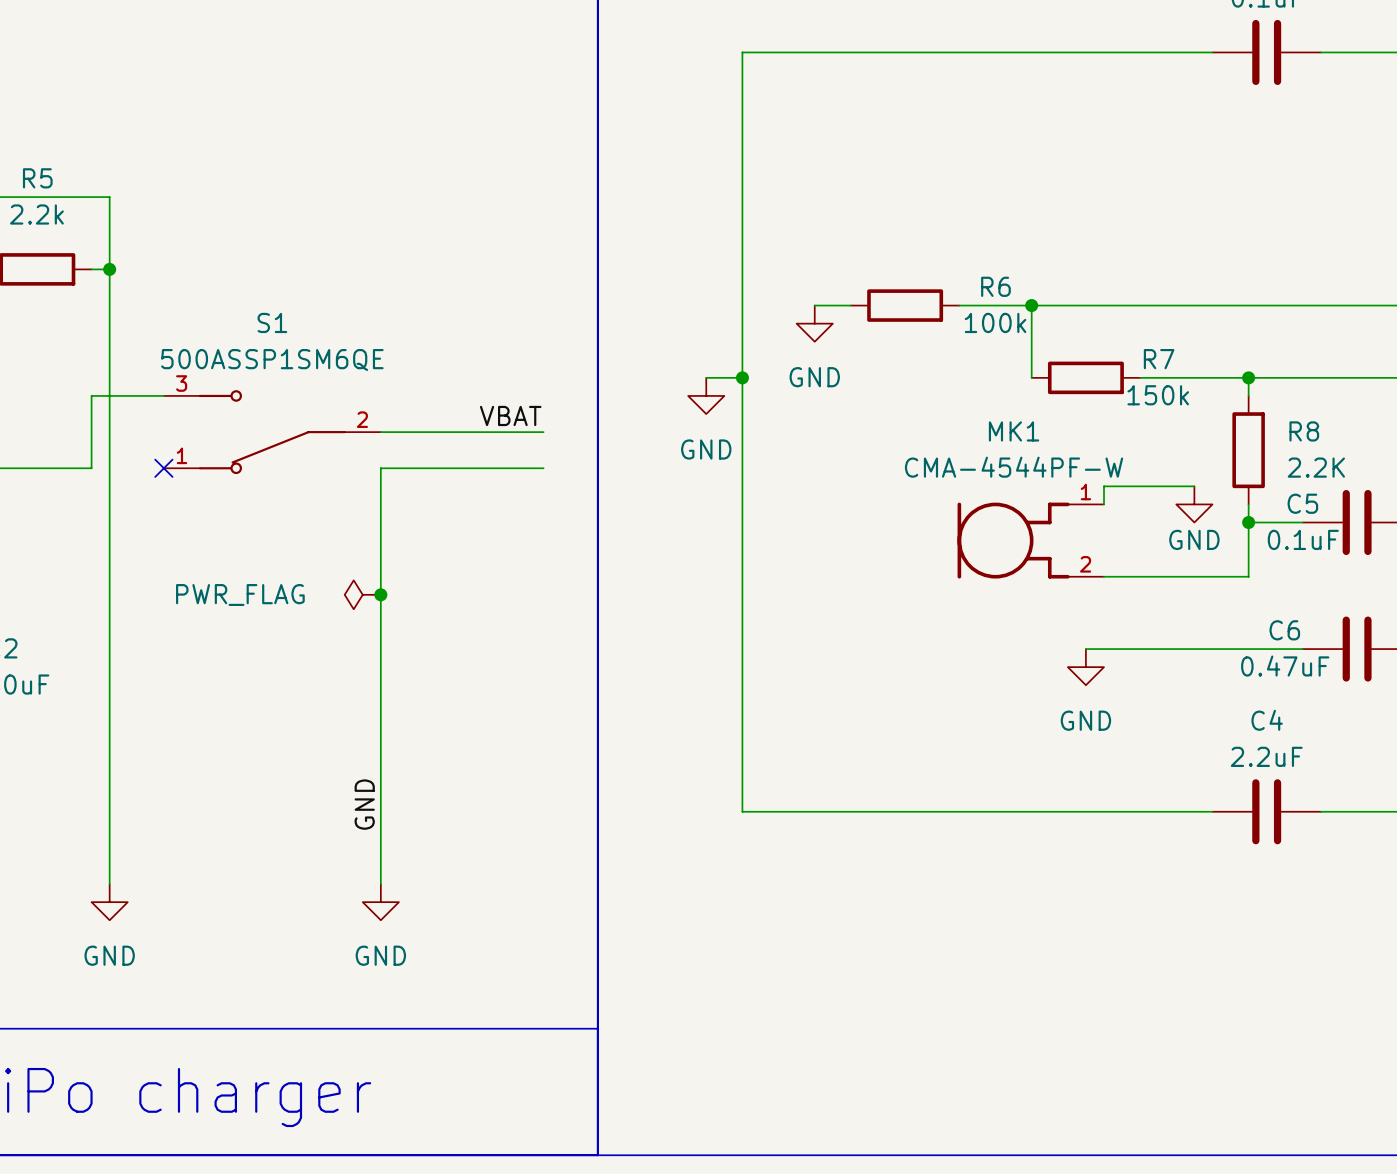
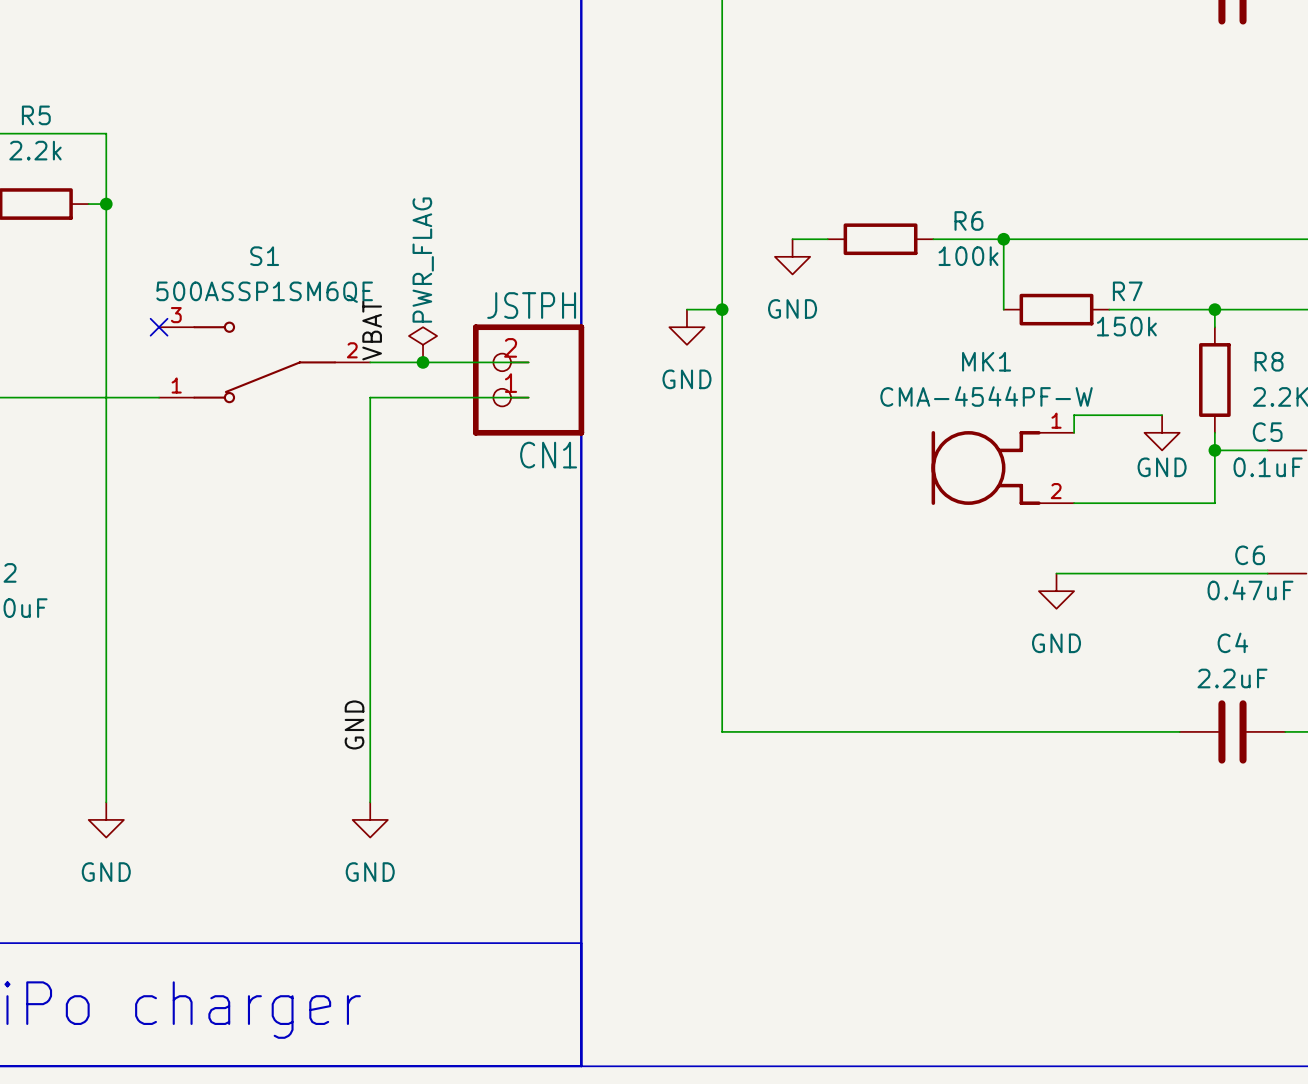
wire: (163, 395) (91, 395) (91, 468) -> (159, 397) (88, 397)
label rotation: 0° (510, 415) -> 90° counterclockwise (372, 330)
label position: VBAT (510, 415) -> VBAT (372, 330)
junction: none -> (423, 362)
CN1: none -> JSTPH (528, 380)
no-connect mark position: (163, 468) -> (159, 327)
power symbol rotation: 0° (362, 594) -> 90° clockwise (423, 344)
power symbol position: PWR_FLAG (362, 594) -> PWR_FLAG (423, 344)
junction: (380, 594) -> none
power symbol text position: PWR_FLAG (240, 595) -> PWR_FLAG (423, 260)

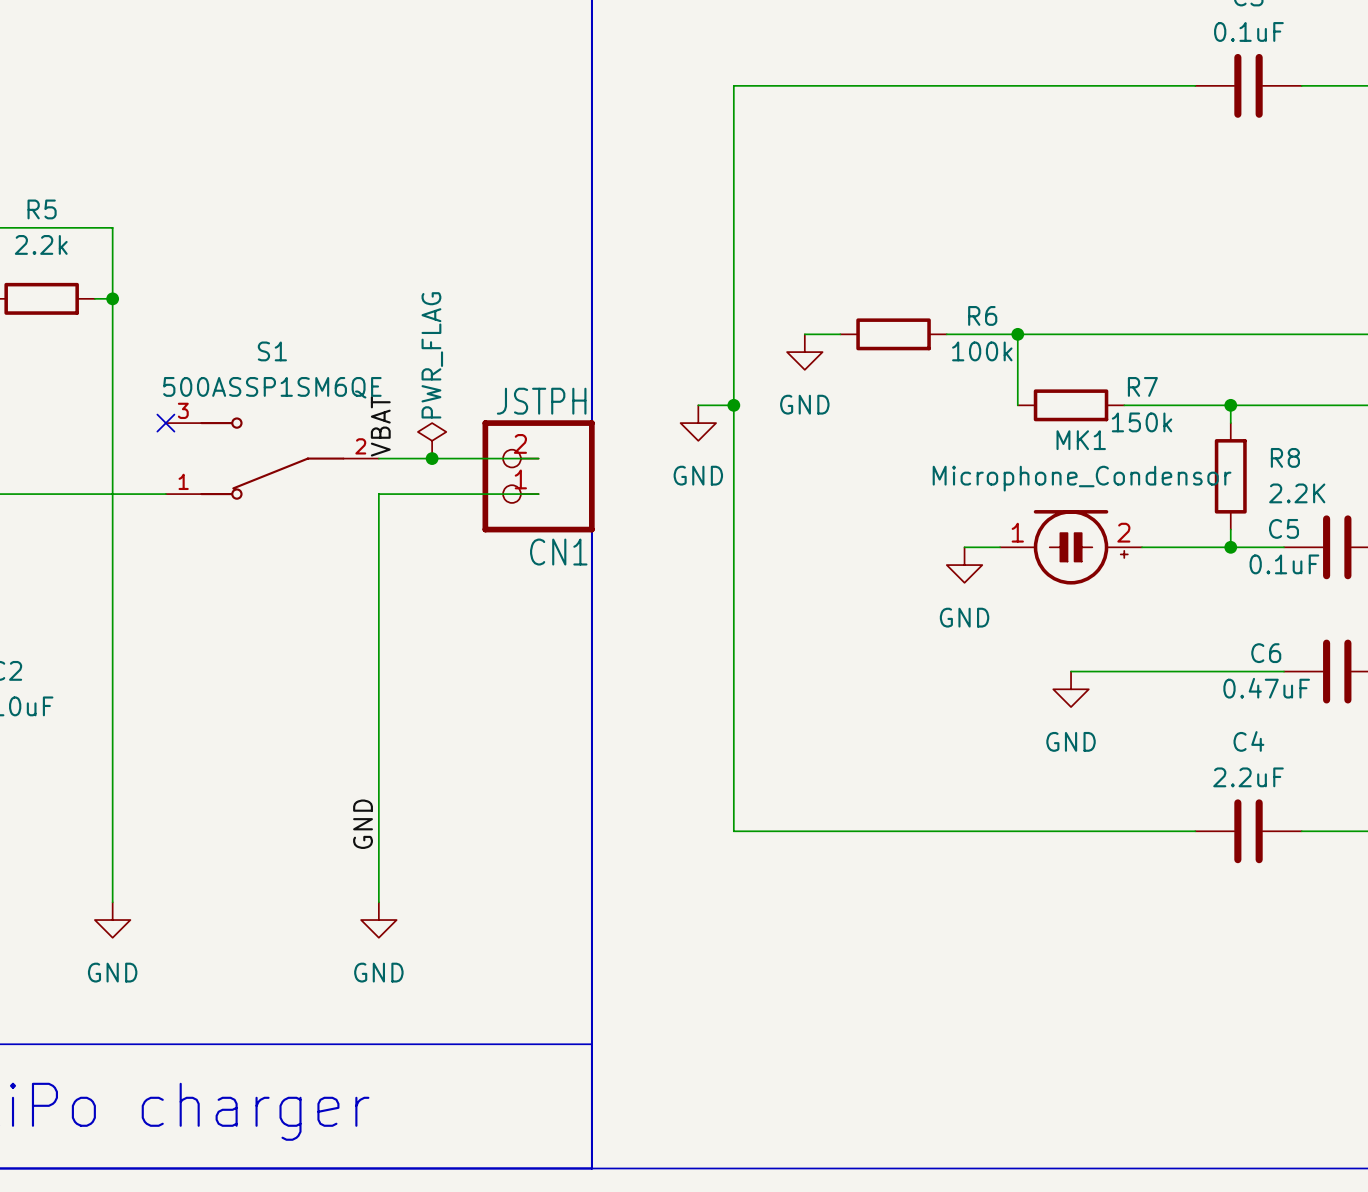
MK1 value: CMA-4544PF-W (986, 396) -> Microphone_Condensor (1082, 478)
wire: (1162, 415) (1074, 415) (1074, 432) -> none
MK1 symbol: [931, 431, 1075, 505] -> [1000, 510, 1143, 585]
power symbol position: GND (1162, 432) -> GND (964, 565)
wire: none -> (964, 547) (1000, 547)
wire: (1214, 450) (1214, 503) (1074, 503) -> (1230, 547) (1142, 547)
power symbol text position: GND (1162, 467) -> GND (964, 617)

